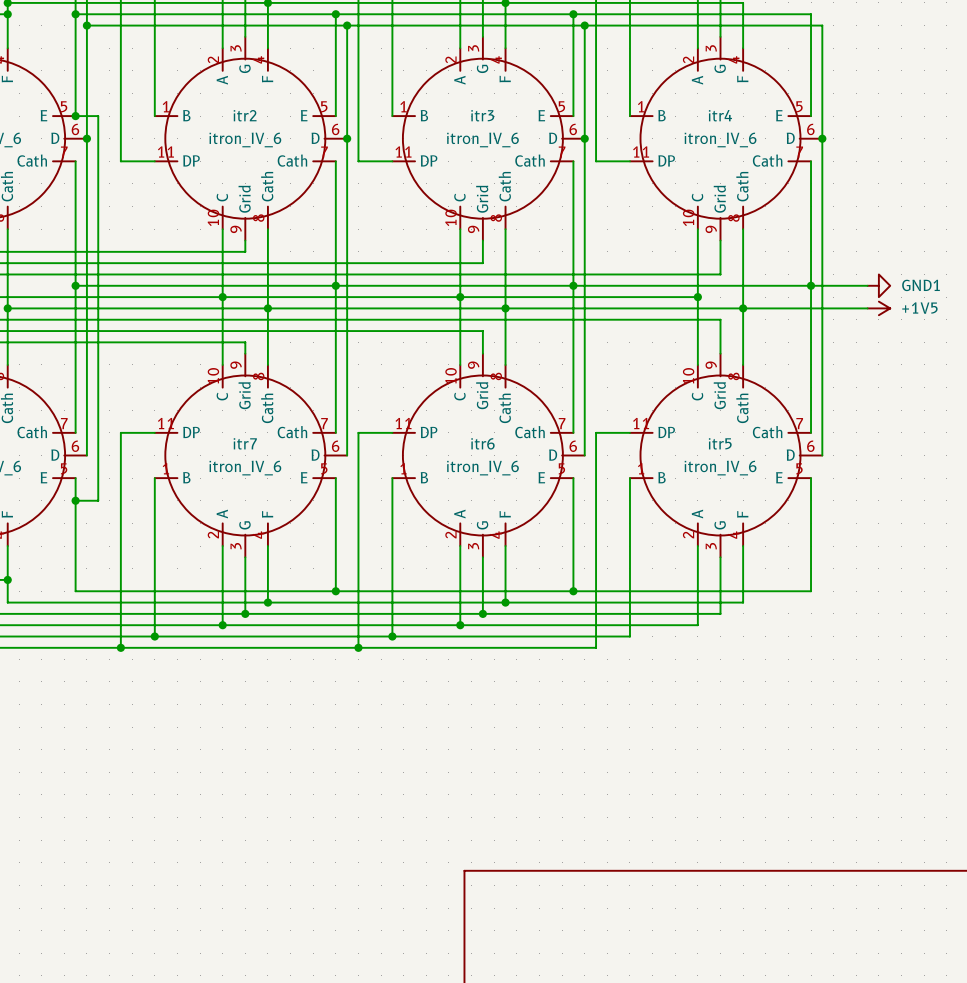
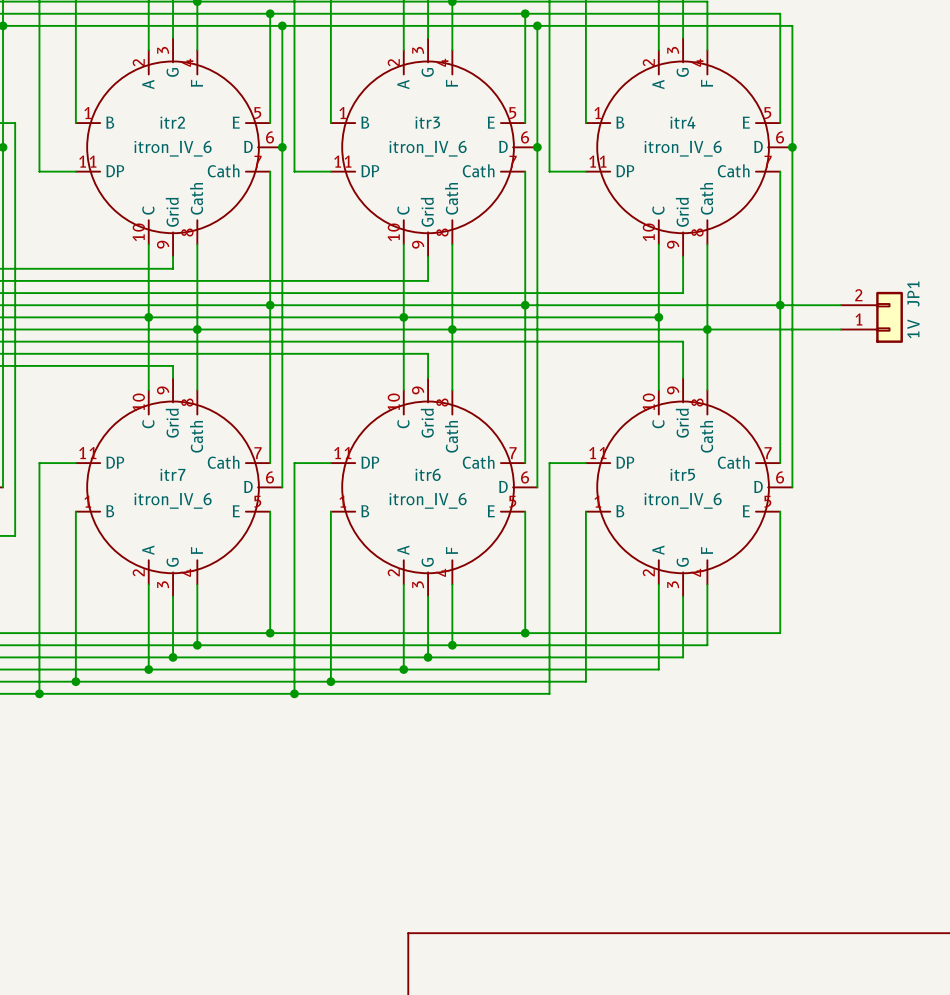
power symbol: GND1 (878, 285) -> none
JP1: none -> 1V (871, 317)
power symbol: +1V5 (878, 308) -> none

